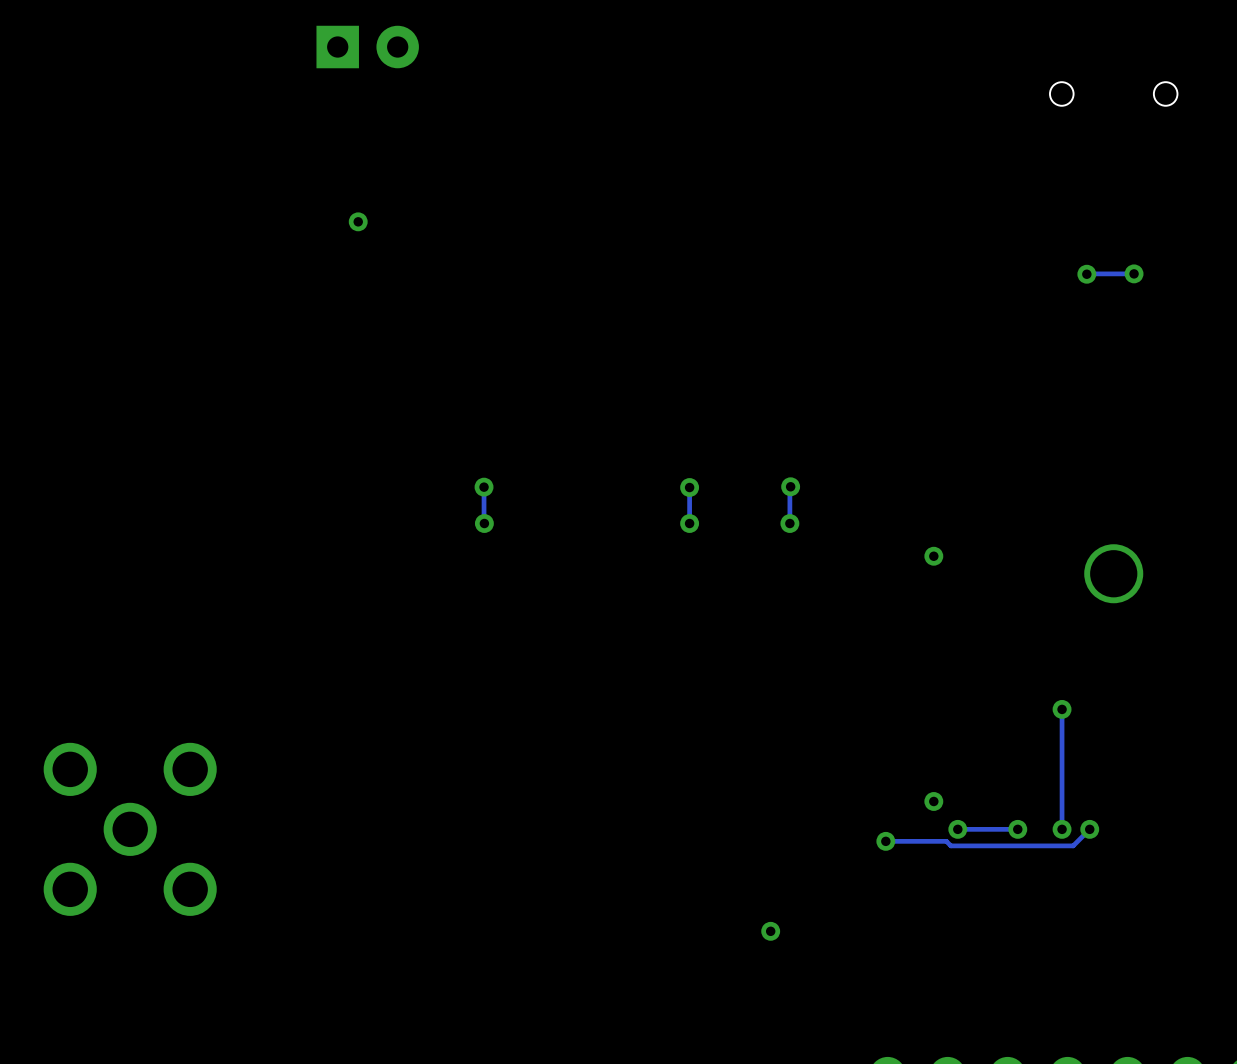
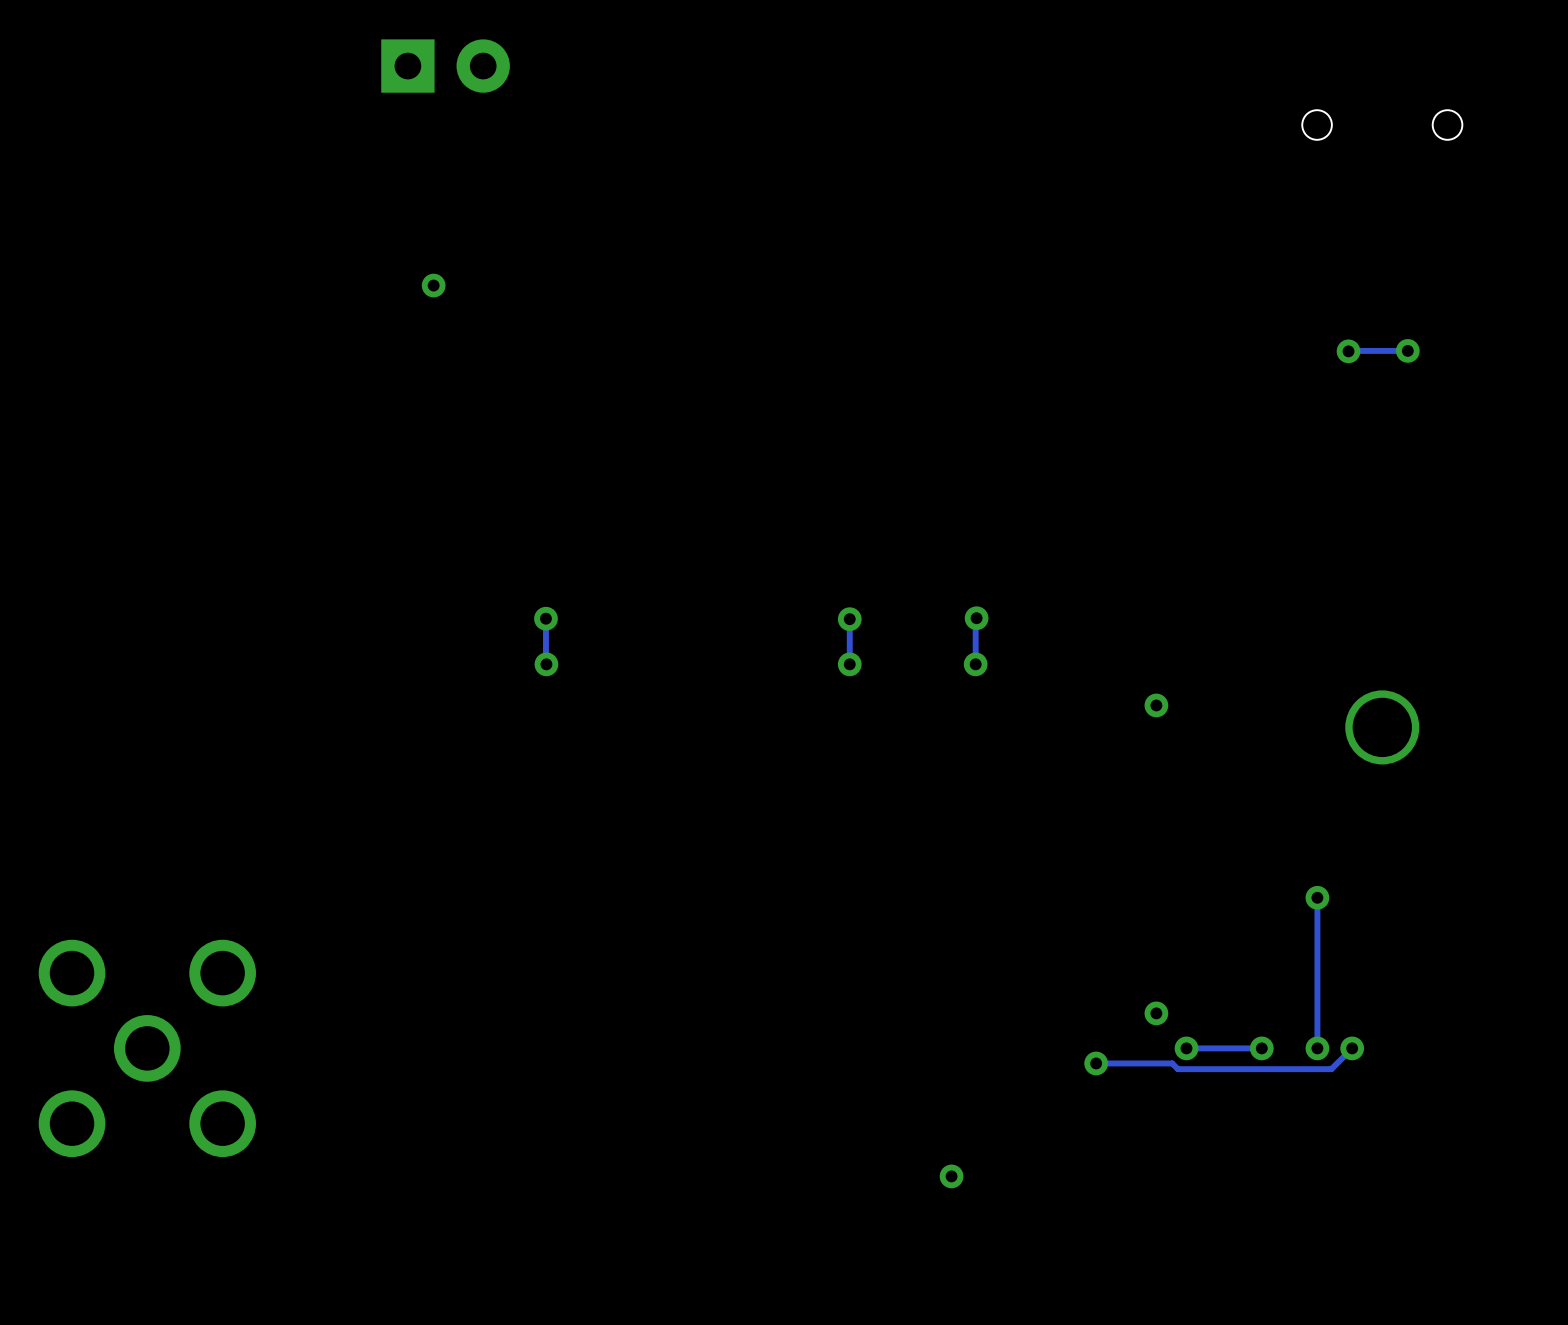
via: none -> (545, 618)
track: (484, 487) (484, 523) -> (545, 618) (546, 664)
via: (484, 487) -> none
via: none -> (546, 664)
via: (484, 523) -> none

